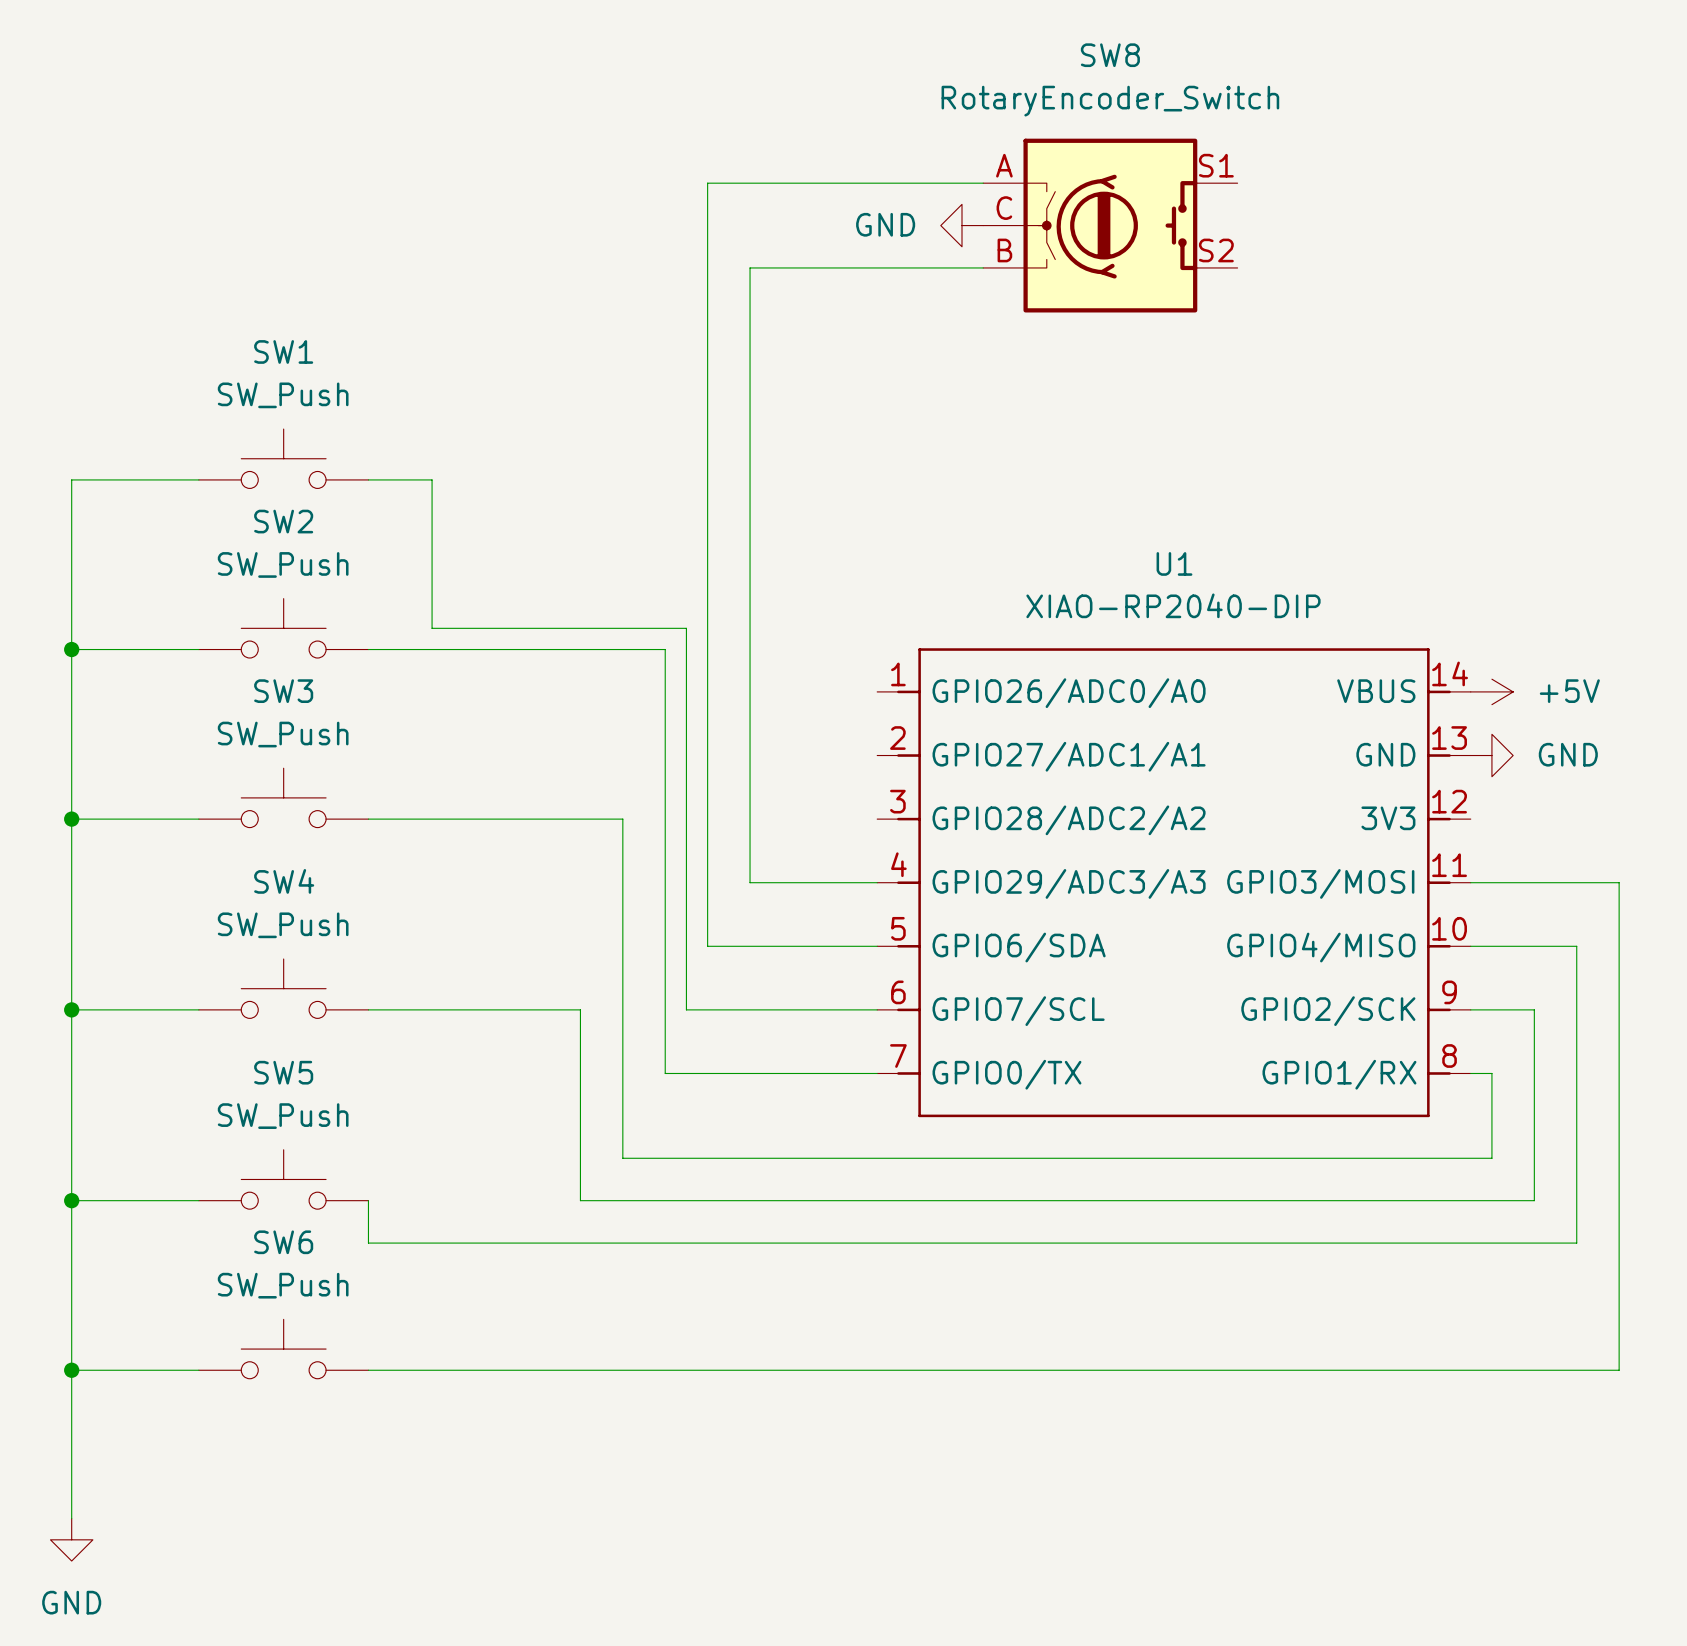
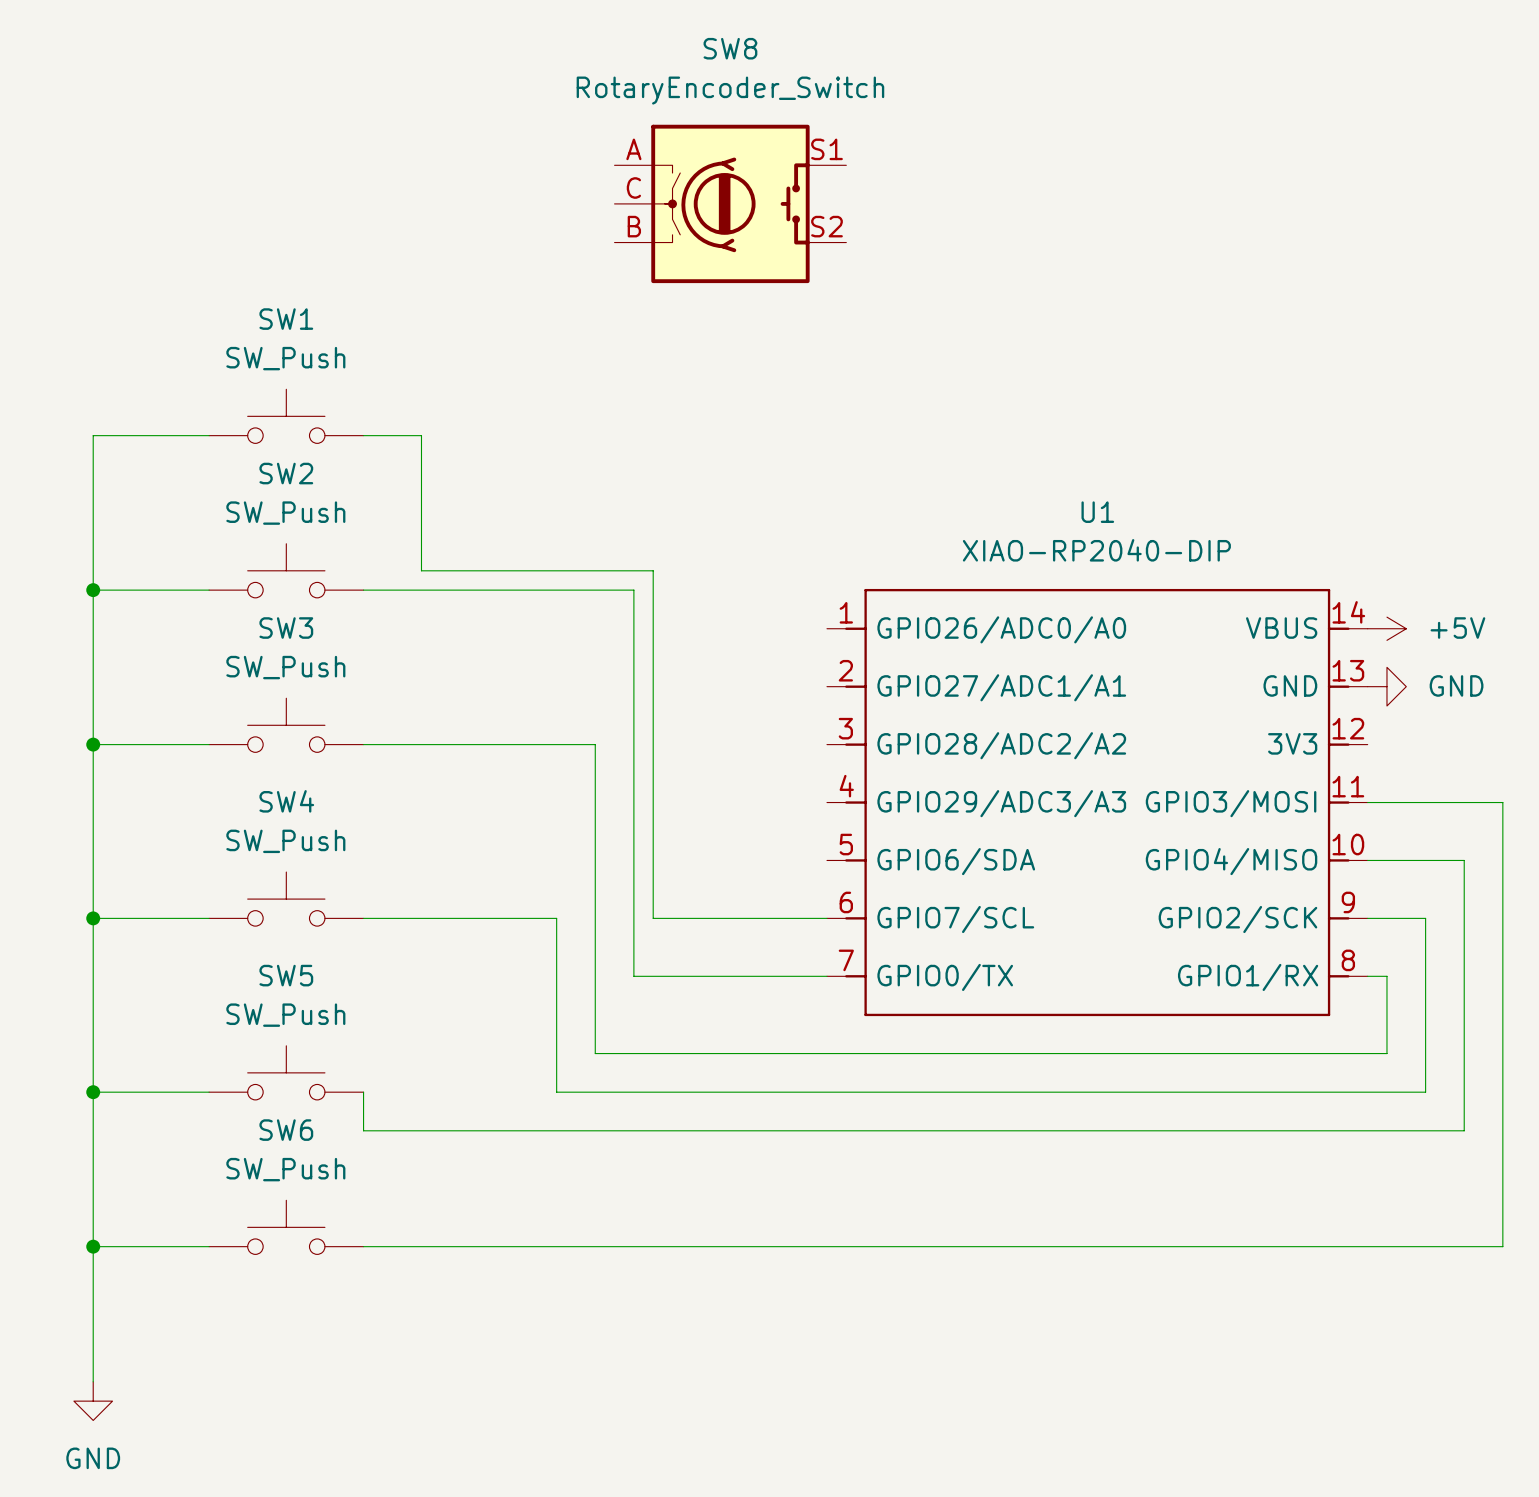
wire: (983, 183) (707, 183) (707, 946) (877, 946) -> none
power symbol: GND (962, 225) -> none
SW8 position: (1110, 225) -> (730, 203)
wire: (983, 267) (750, 267) (750, 882) (877, 882) -> none

